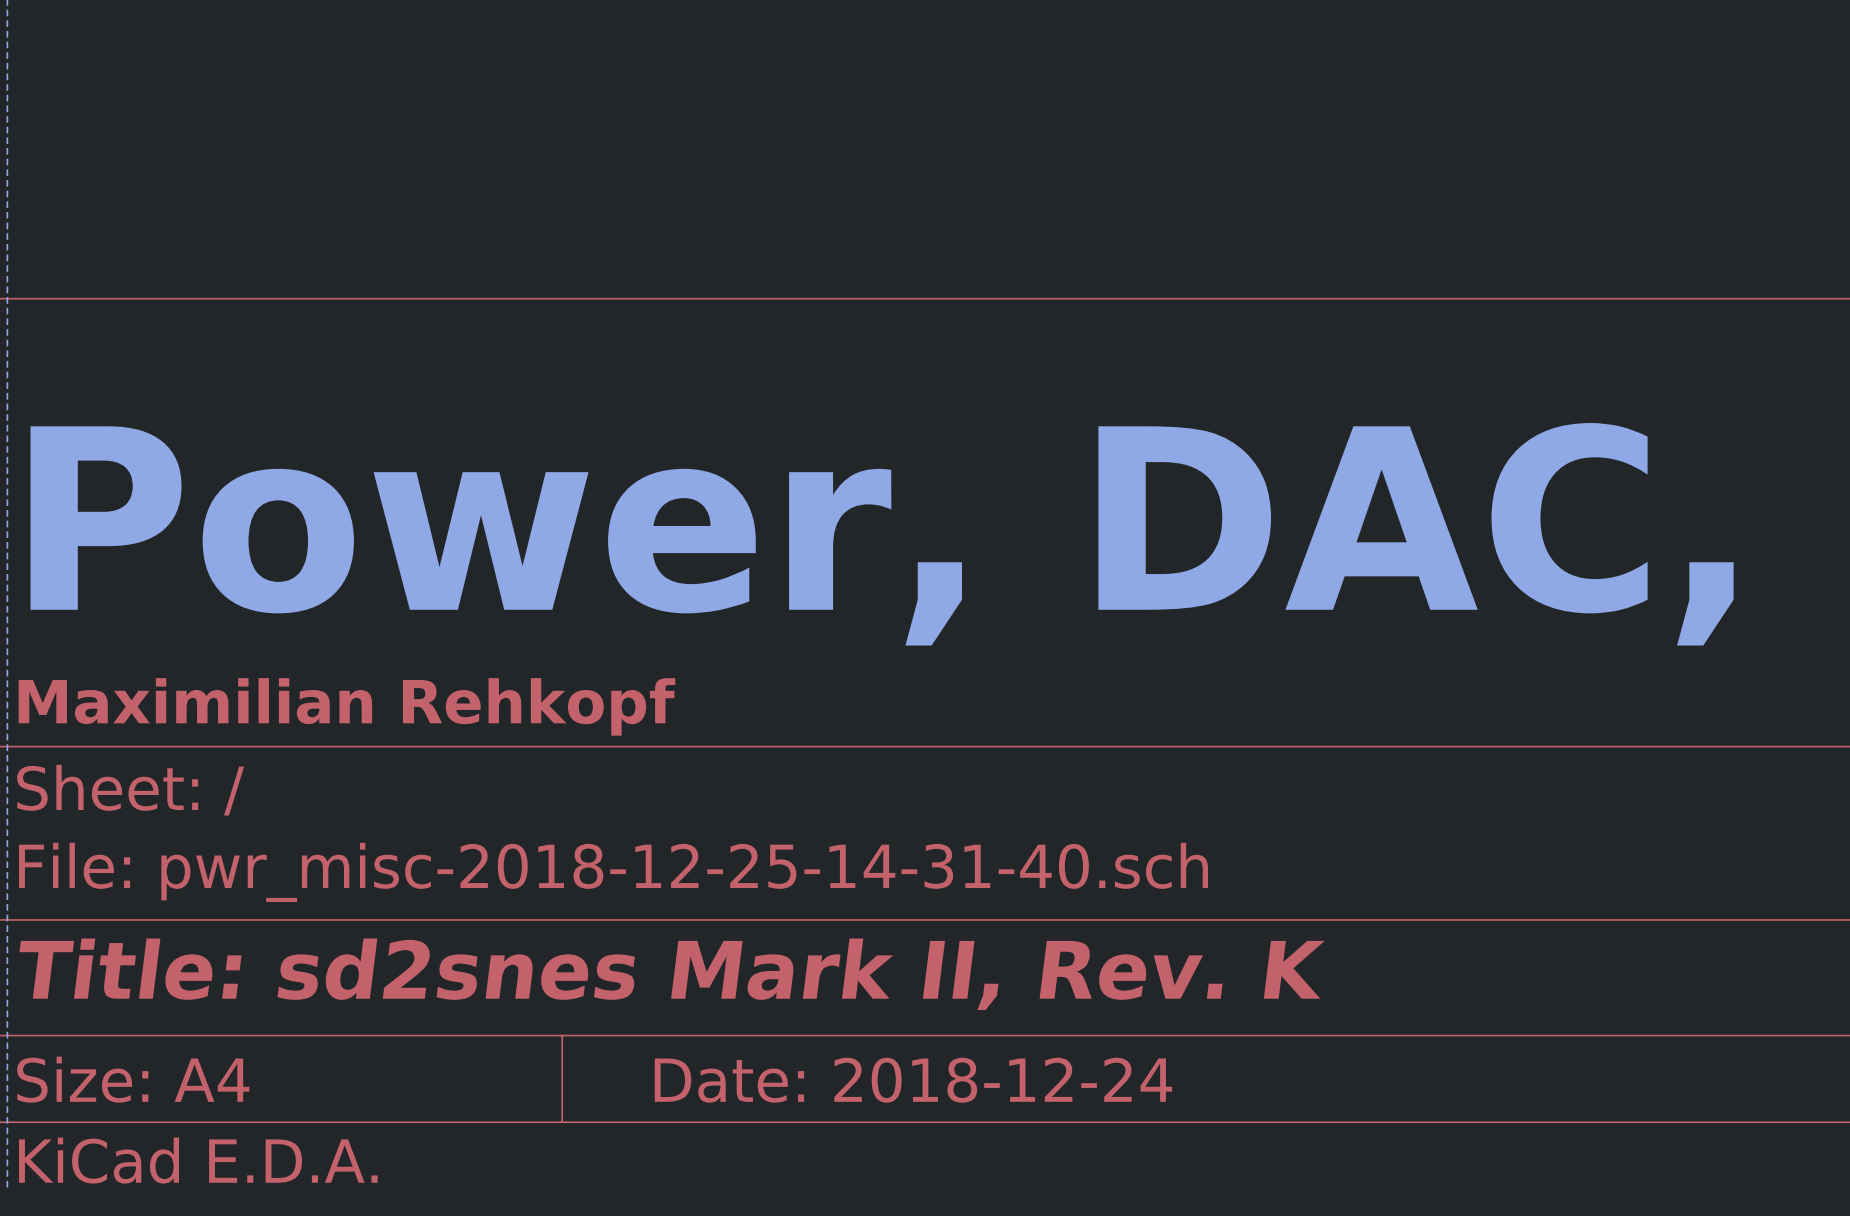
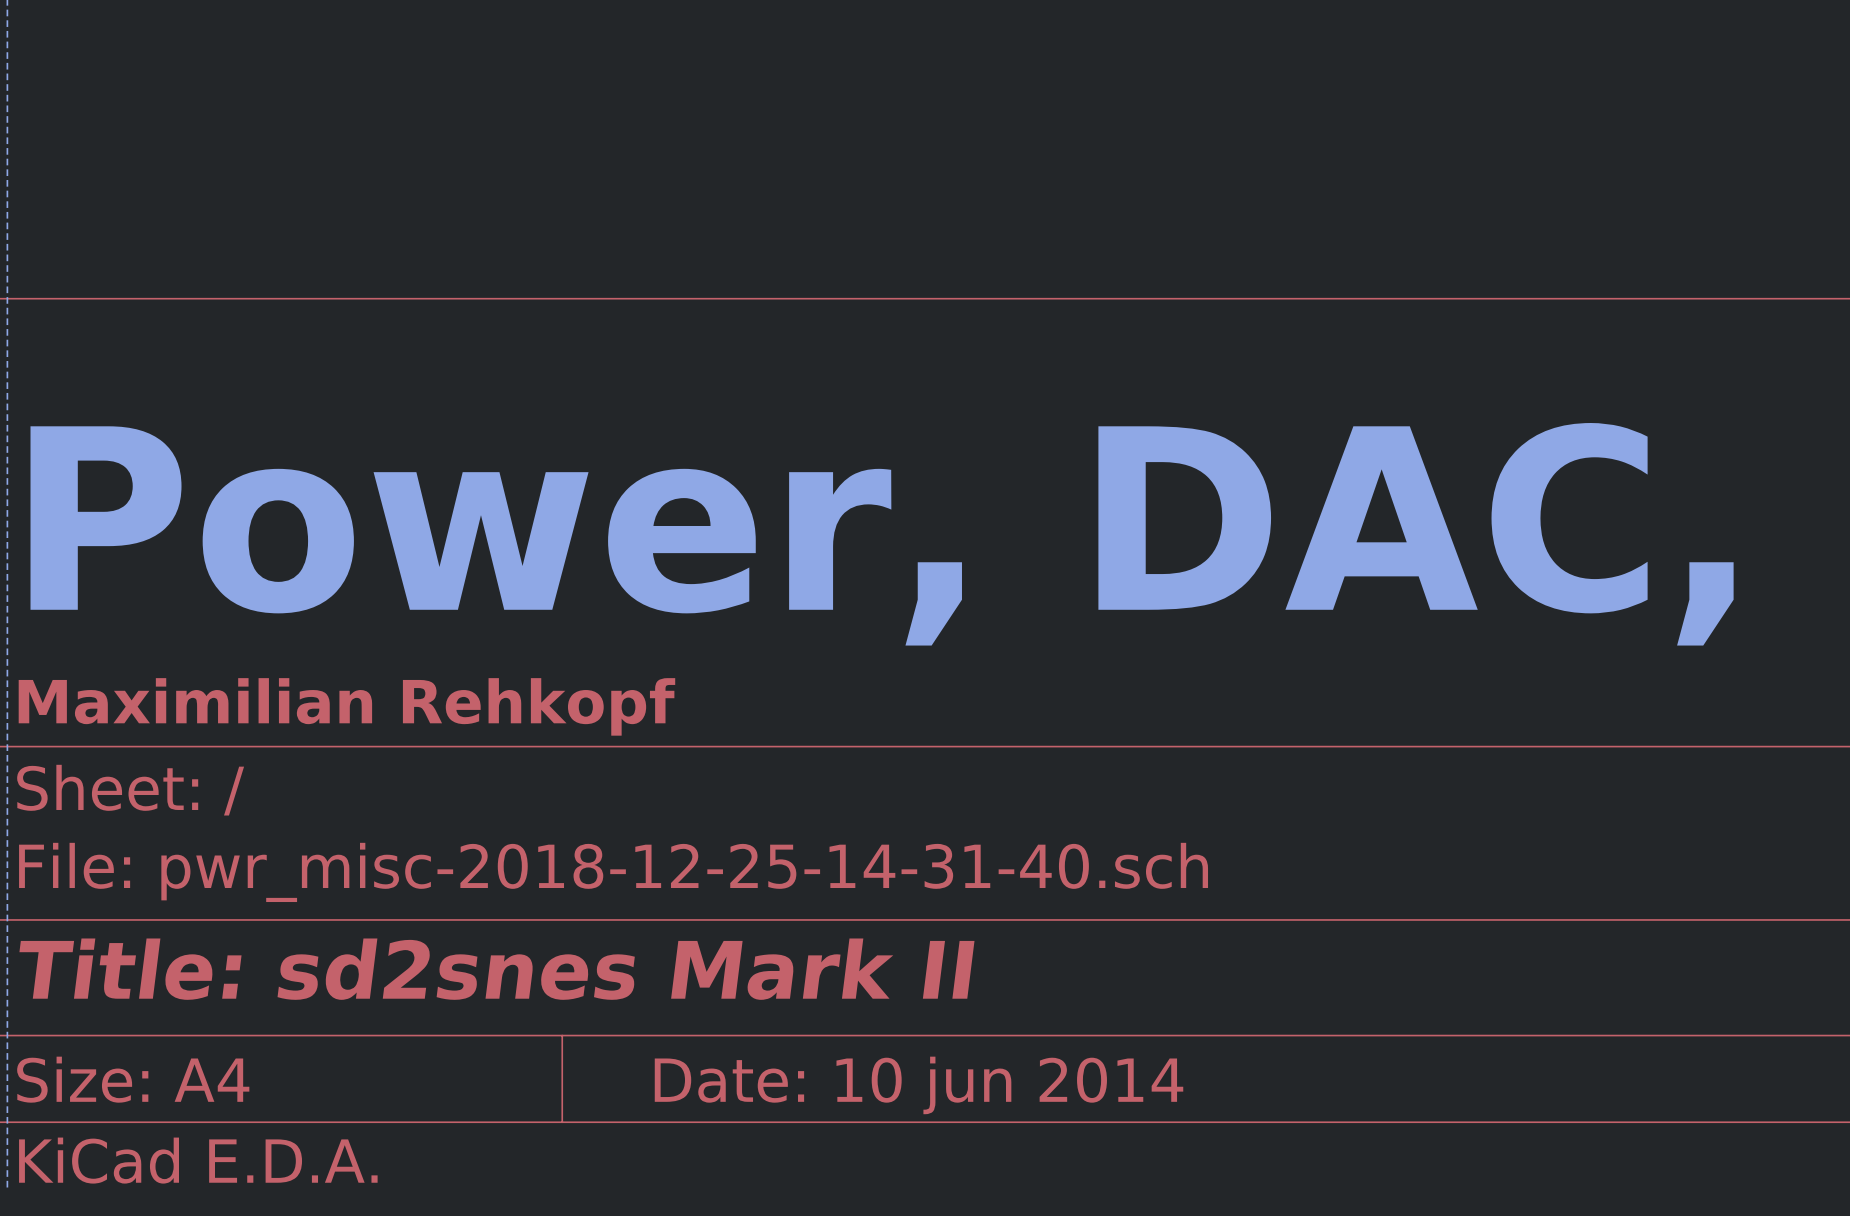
title block: Title: sd2snes Mark II, Rev. K (672, 974) -> Title: sd2snes Mark II (496, 969)
title block: Date: 2018-12-24 (913, 1080) -> Date: 10 jun 2014 (919, 1085)

